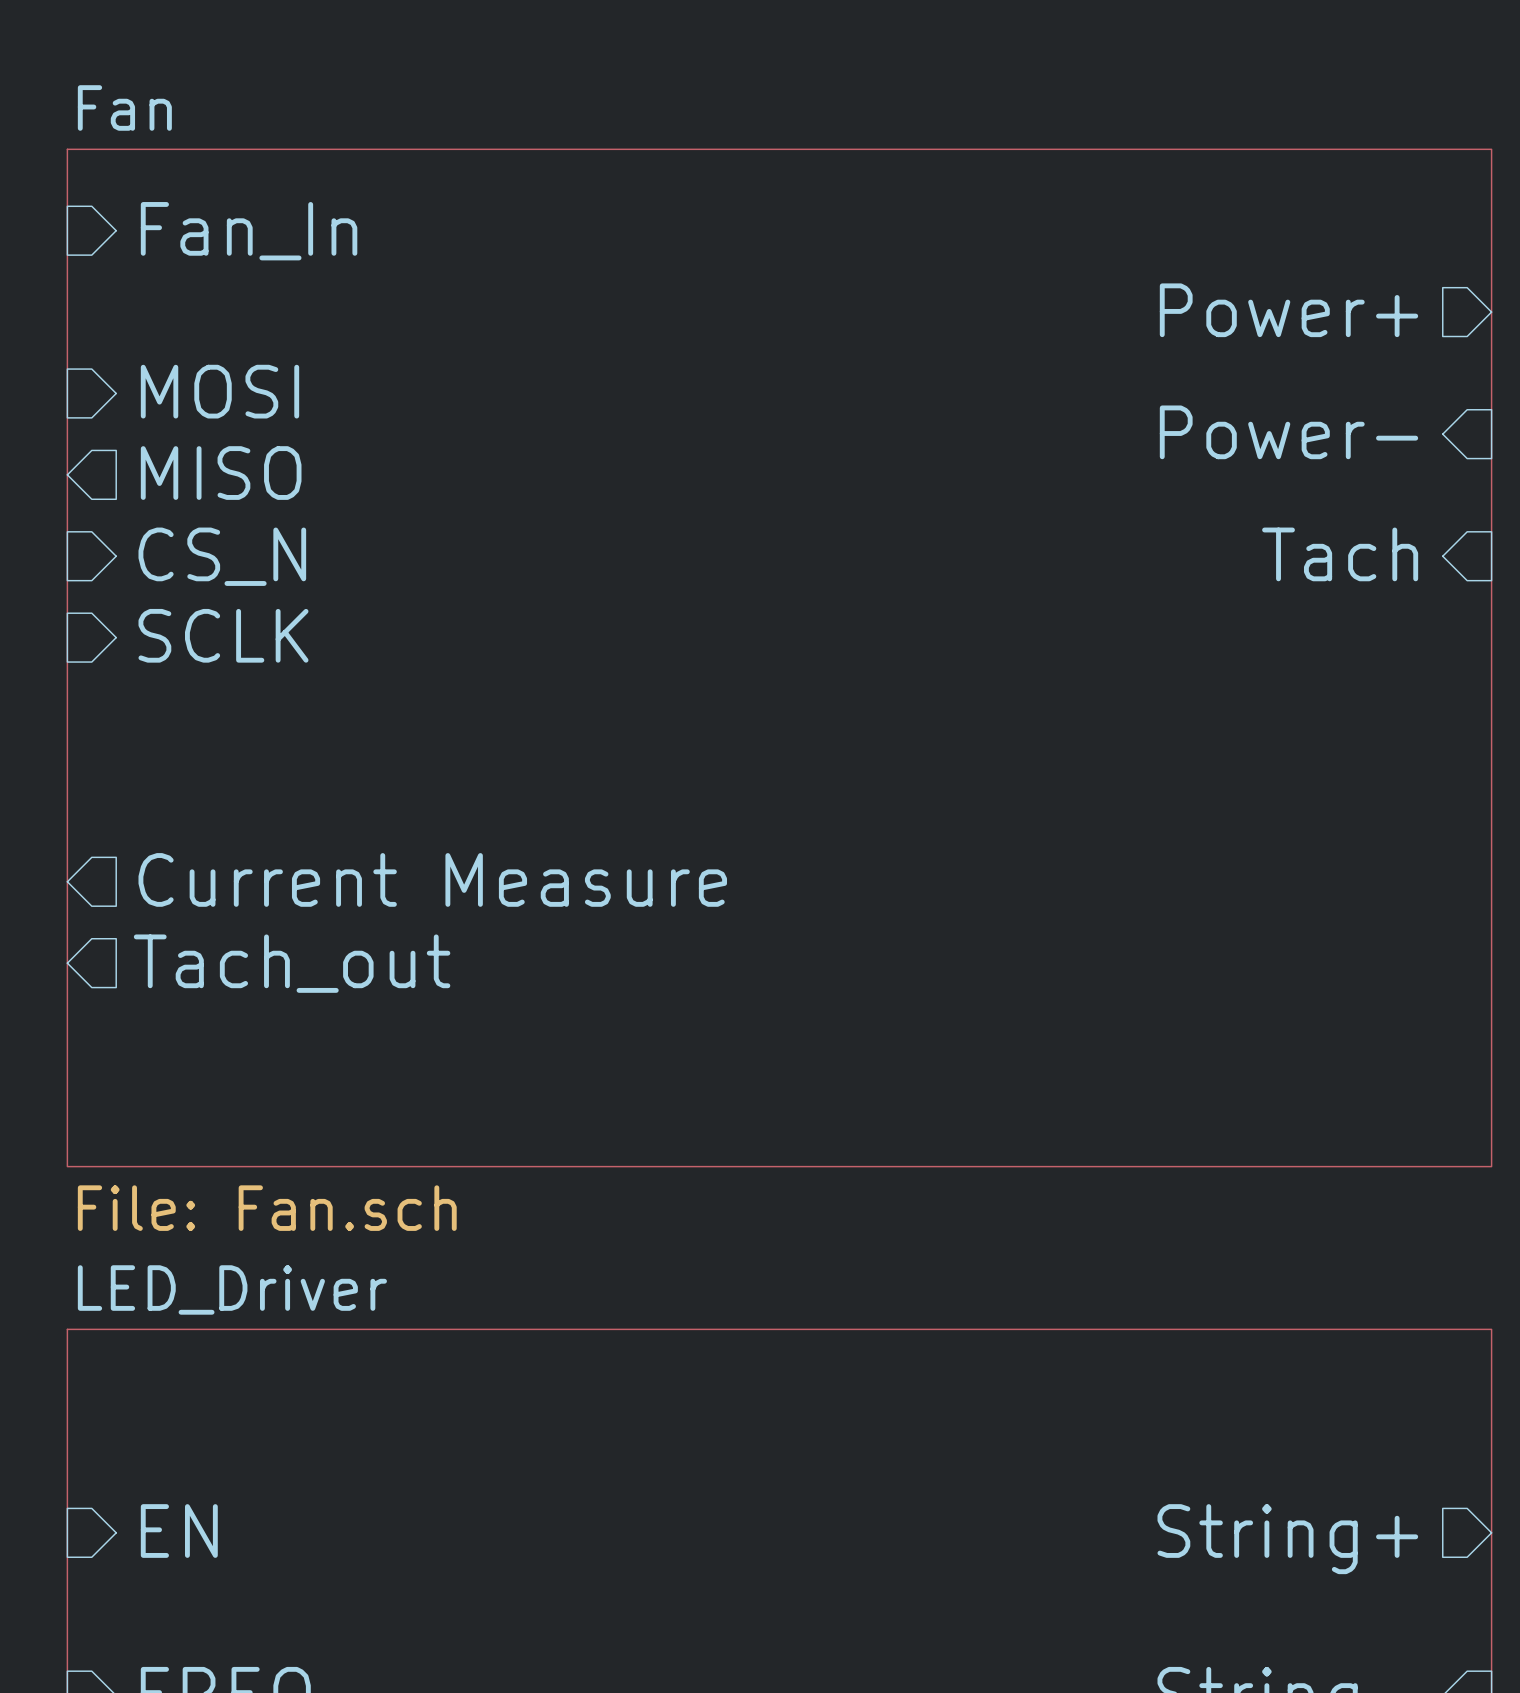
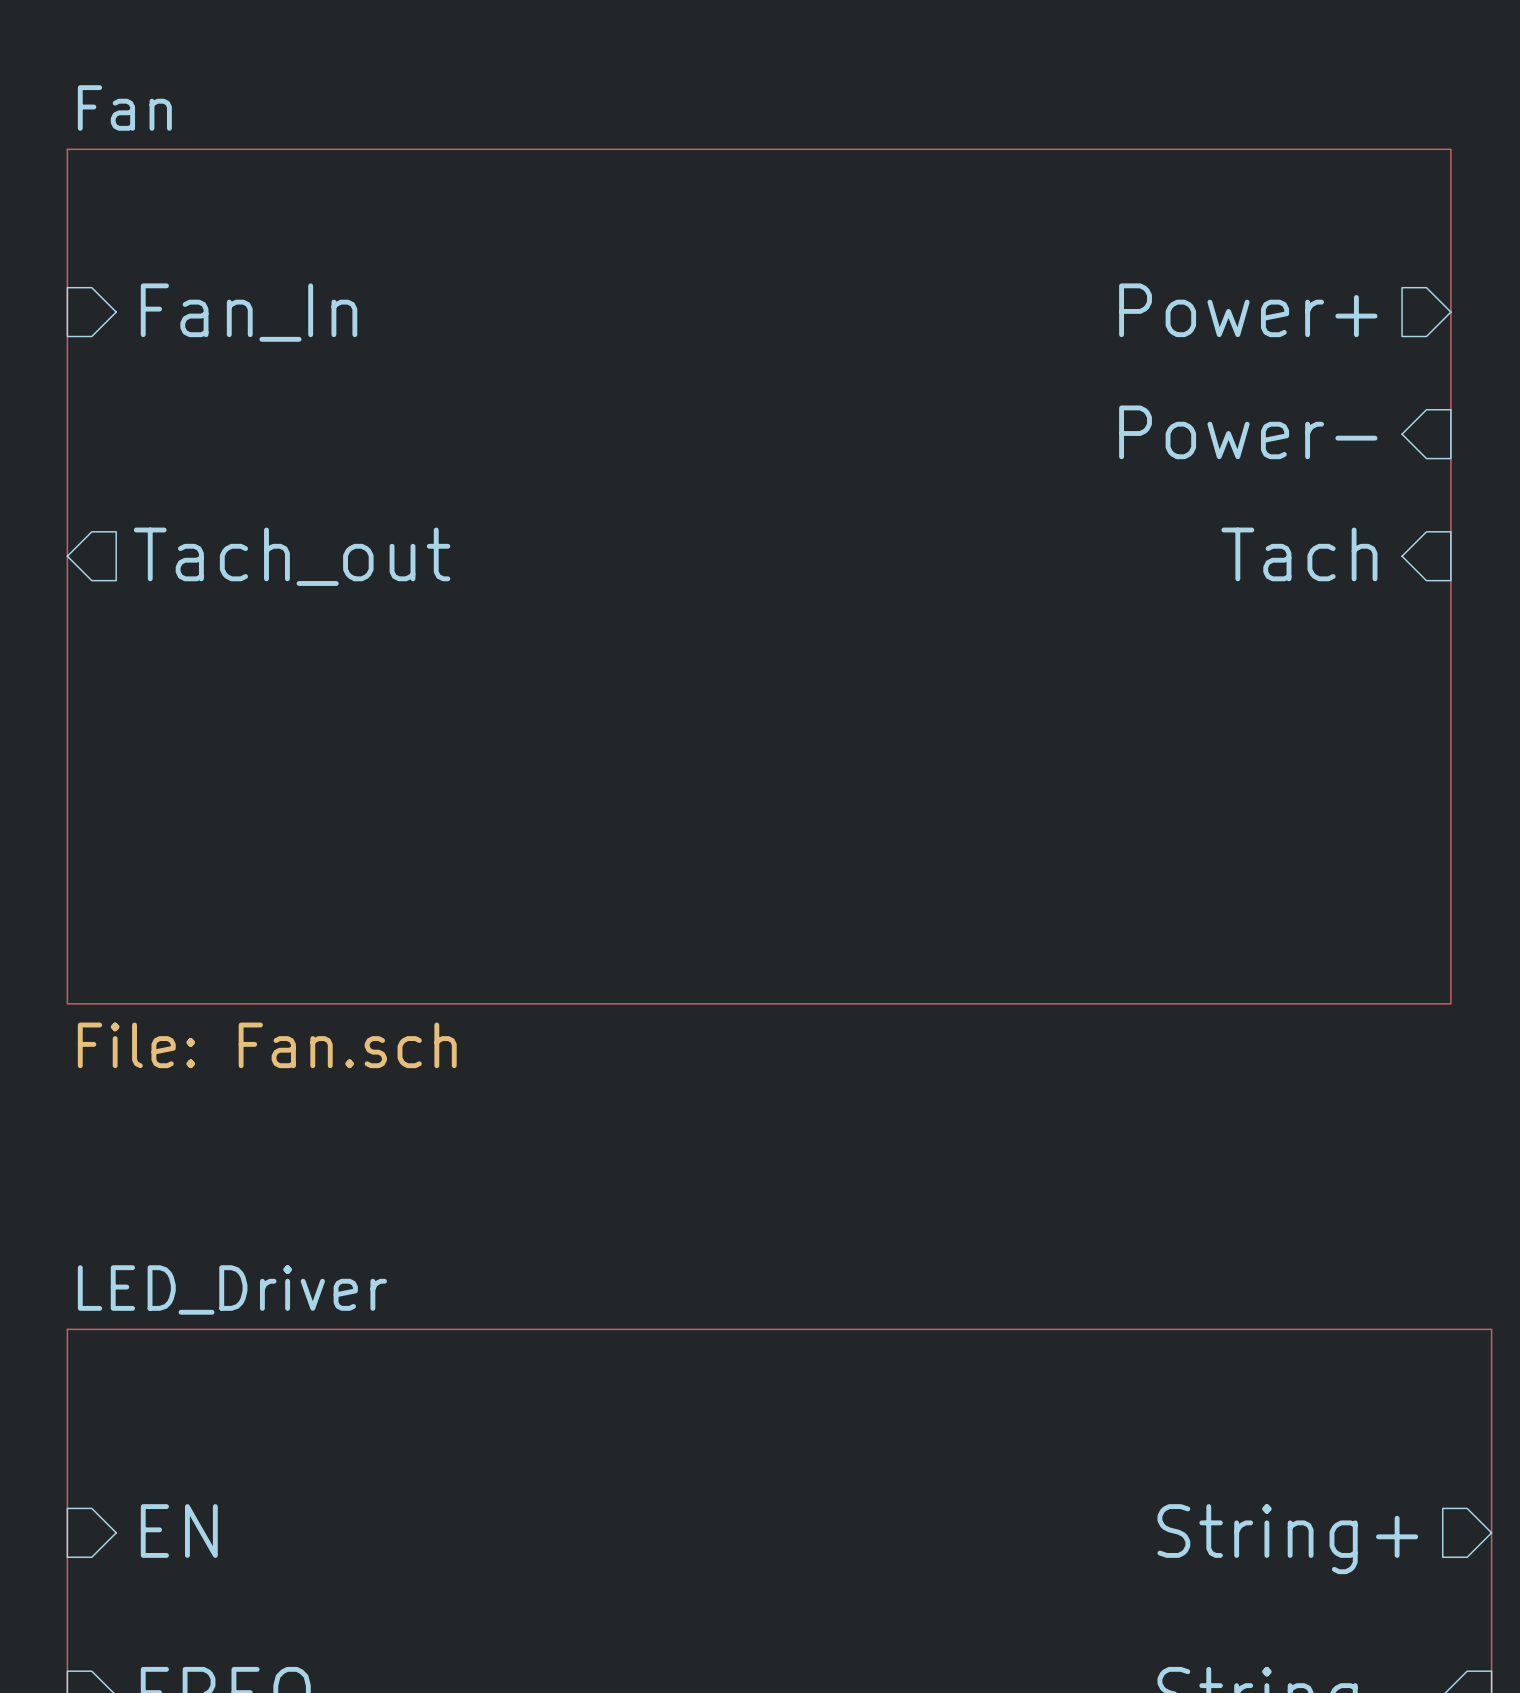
sheet pin position: Fan_In (249, 231) -> Fan_In (249, 312)
sheet pin position: Power+ (1288, 310) -> Power+ (1248, 310)
sheet pin: MOSI (219, 391) -> none
sheet pin position: Power- (1288, 432) -> Power- (1248, 432)
sheet pin: MISO (221, 473) -> none
sheet pin position: Tach (1340, 554) -> Tach (1299, 554)
sheet pin shape: input (222, 556) -> output (292, 556)
sheet pin: CS_N (222, 556) -> Tach_out (292, 556)
sheet Fan: none -> File: Fan.sch (759, 576)
sheet pin: SCLK (223, 635) -> none
sheet Fan: File: Fan.sch (779, 657) -> none
sheet pin: Current Measure (432, 879) -> none
sheet pin: Tach_out (292, 963) -> none

